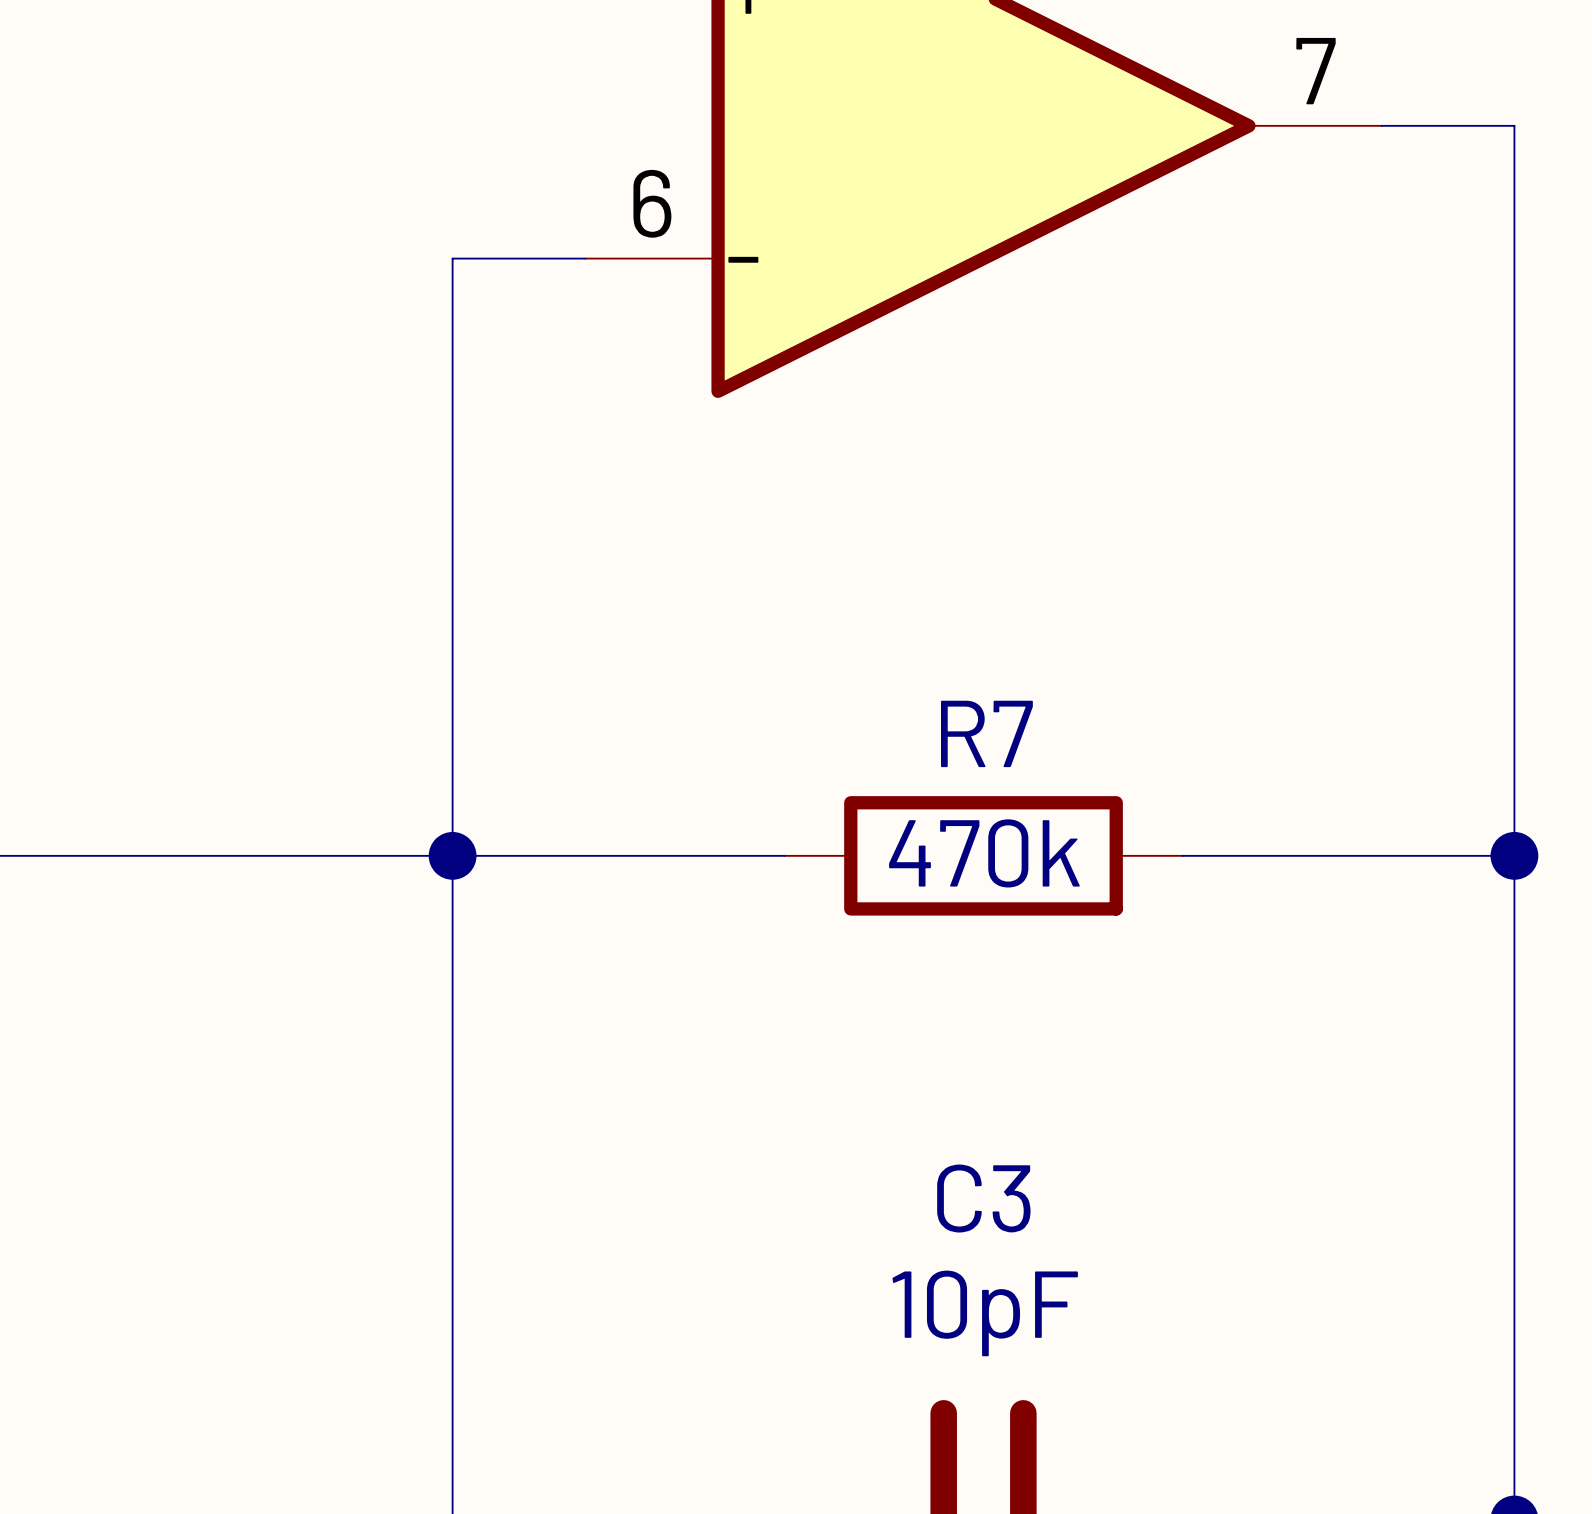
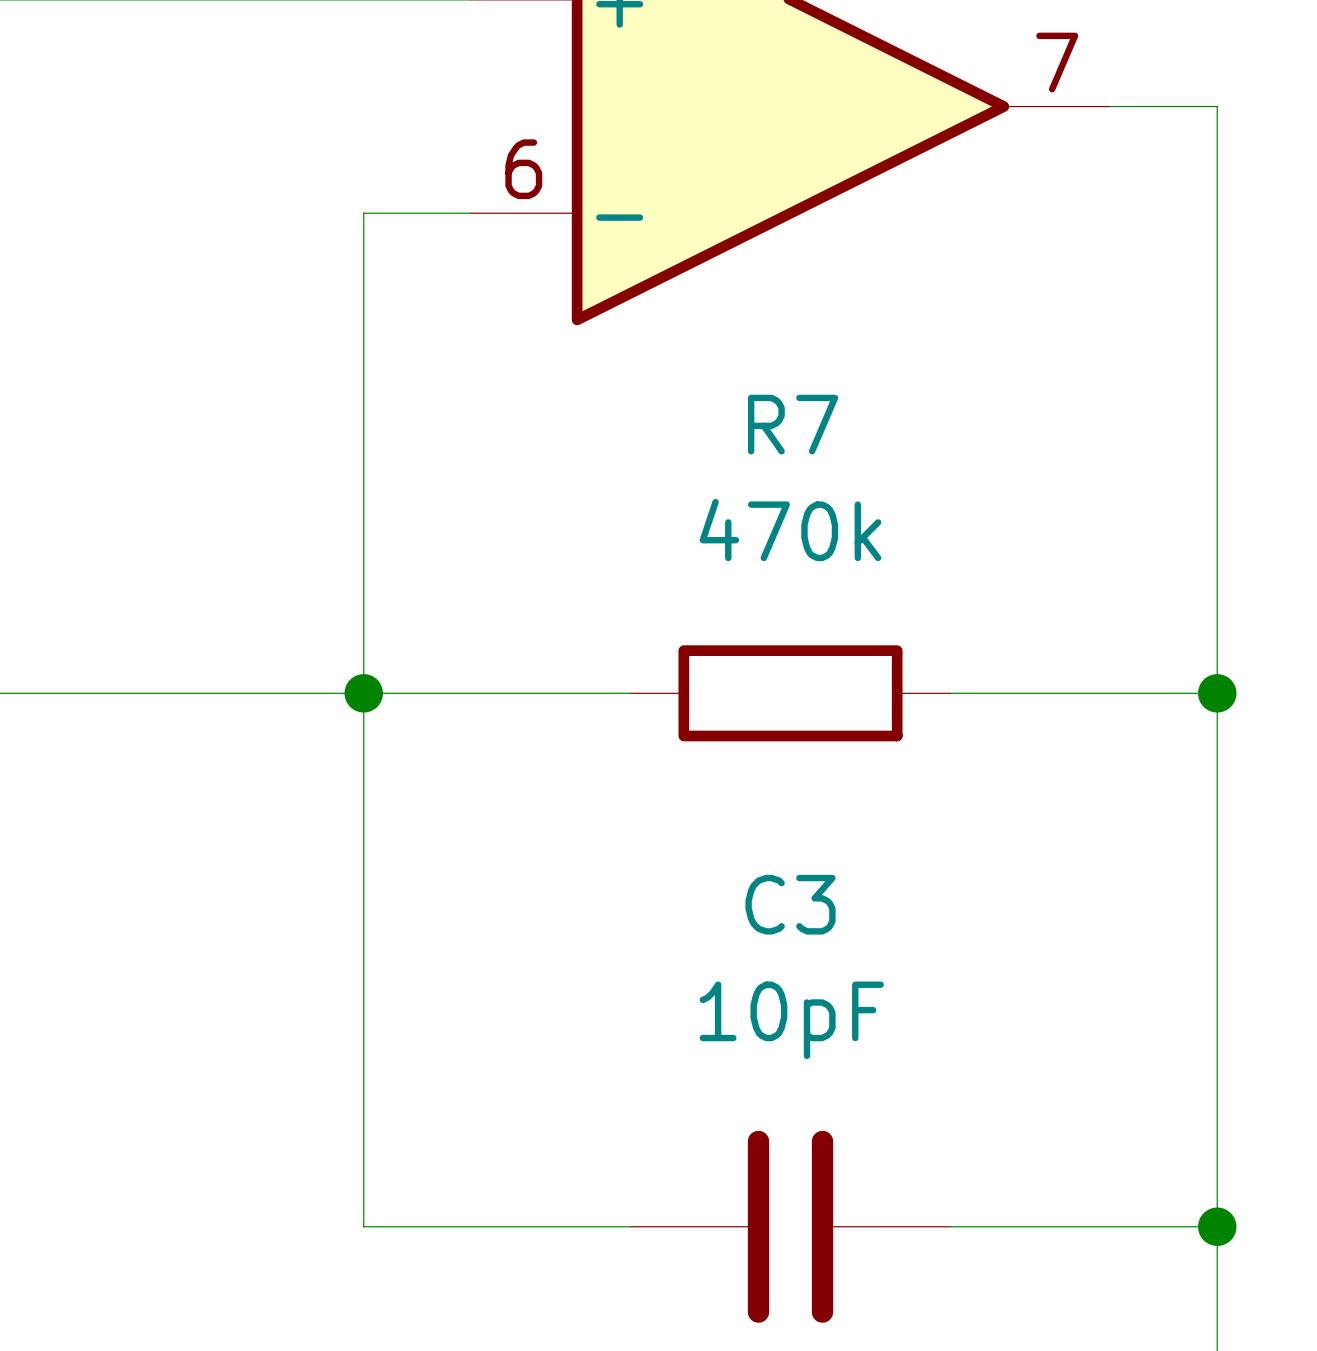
R7 name position: R7 (986, 733) -> R7 (793, 424)
R7 value position: 470k (984, 853) -> 470k (790, 530)
C3 name position: C3 (983, 1198) -> C3 (790, 904)
C3 value position: 10pF (985, 1313) -> 10pF (791, 1020)

